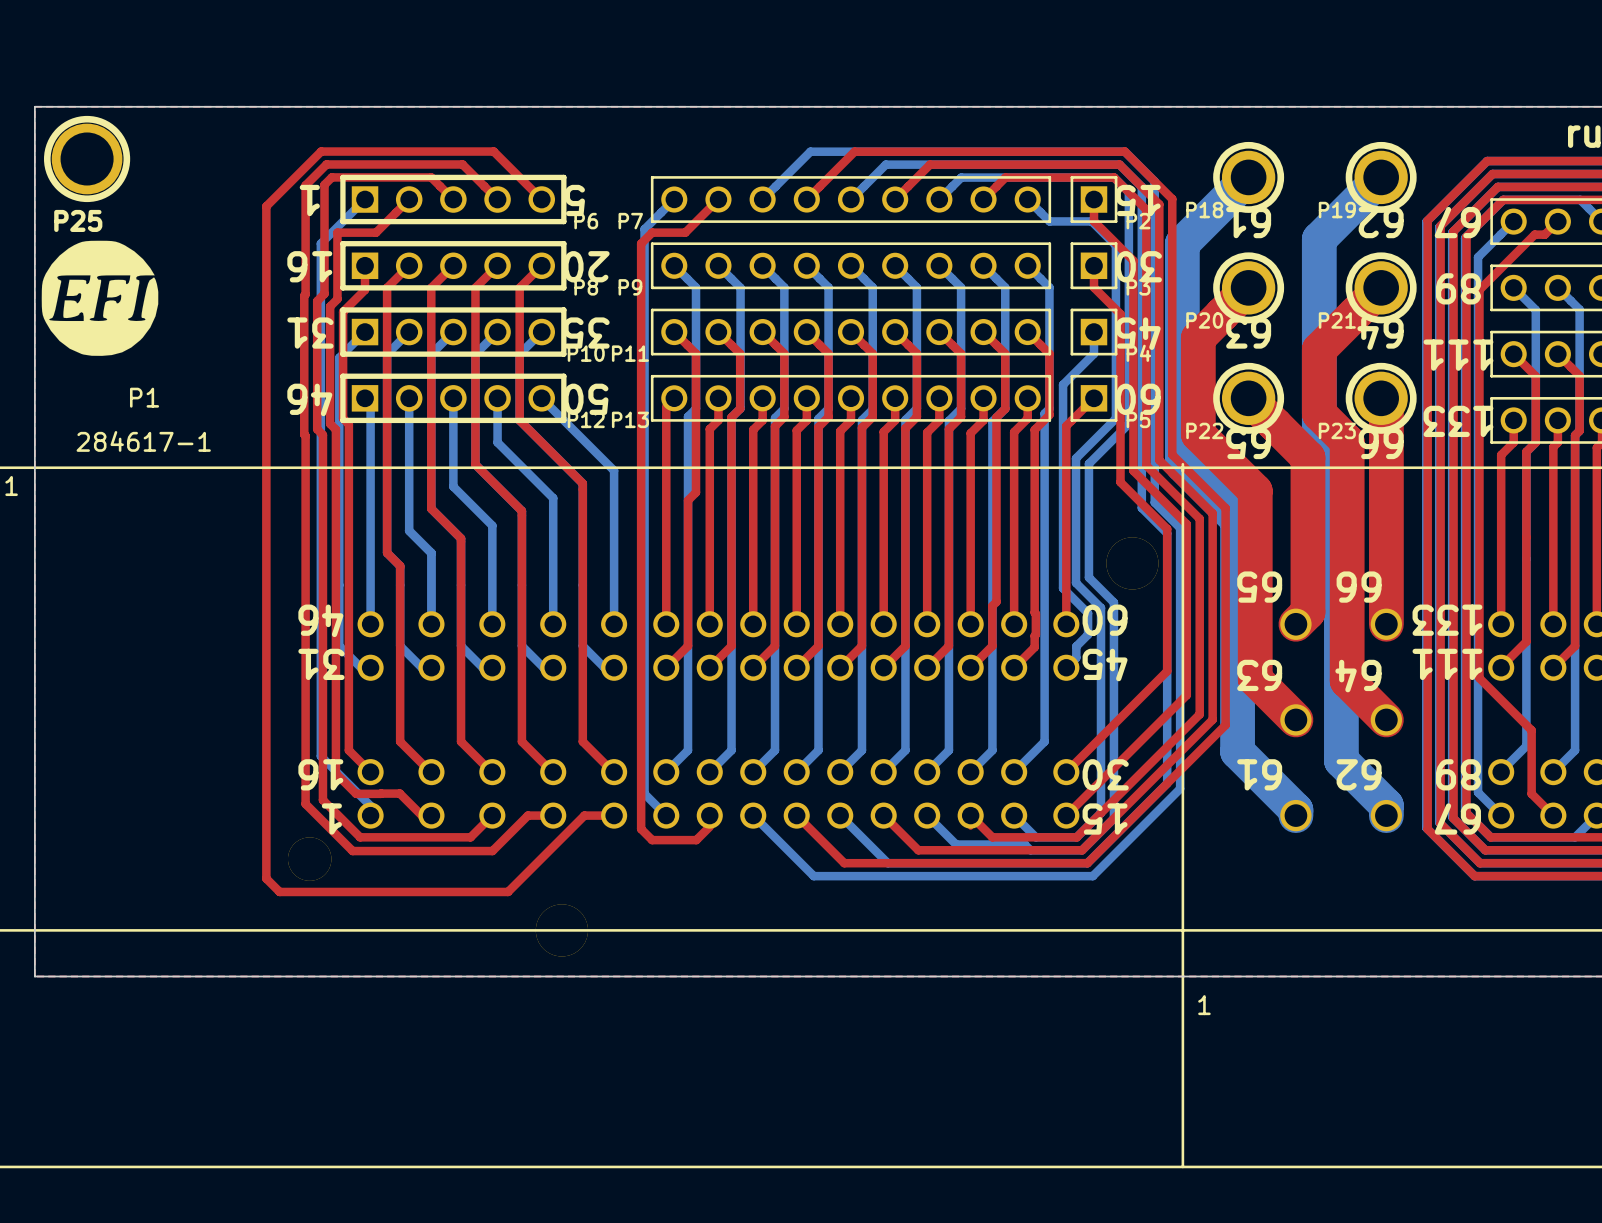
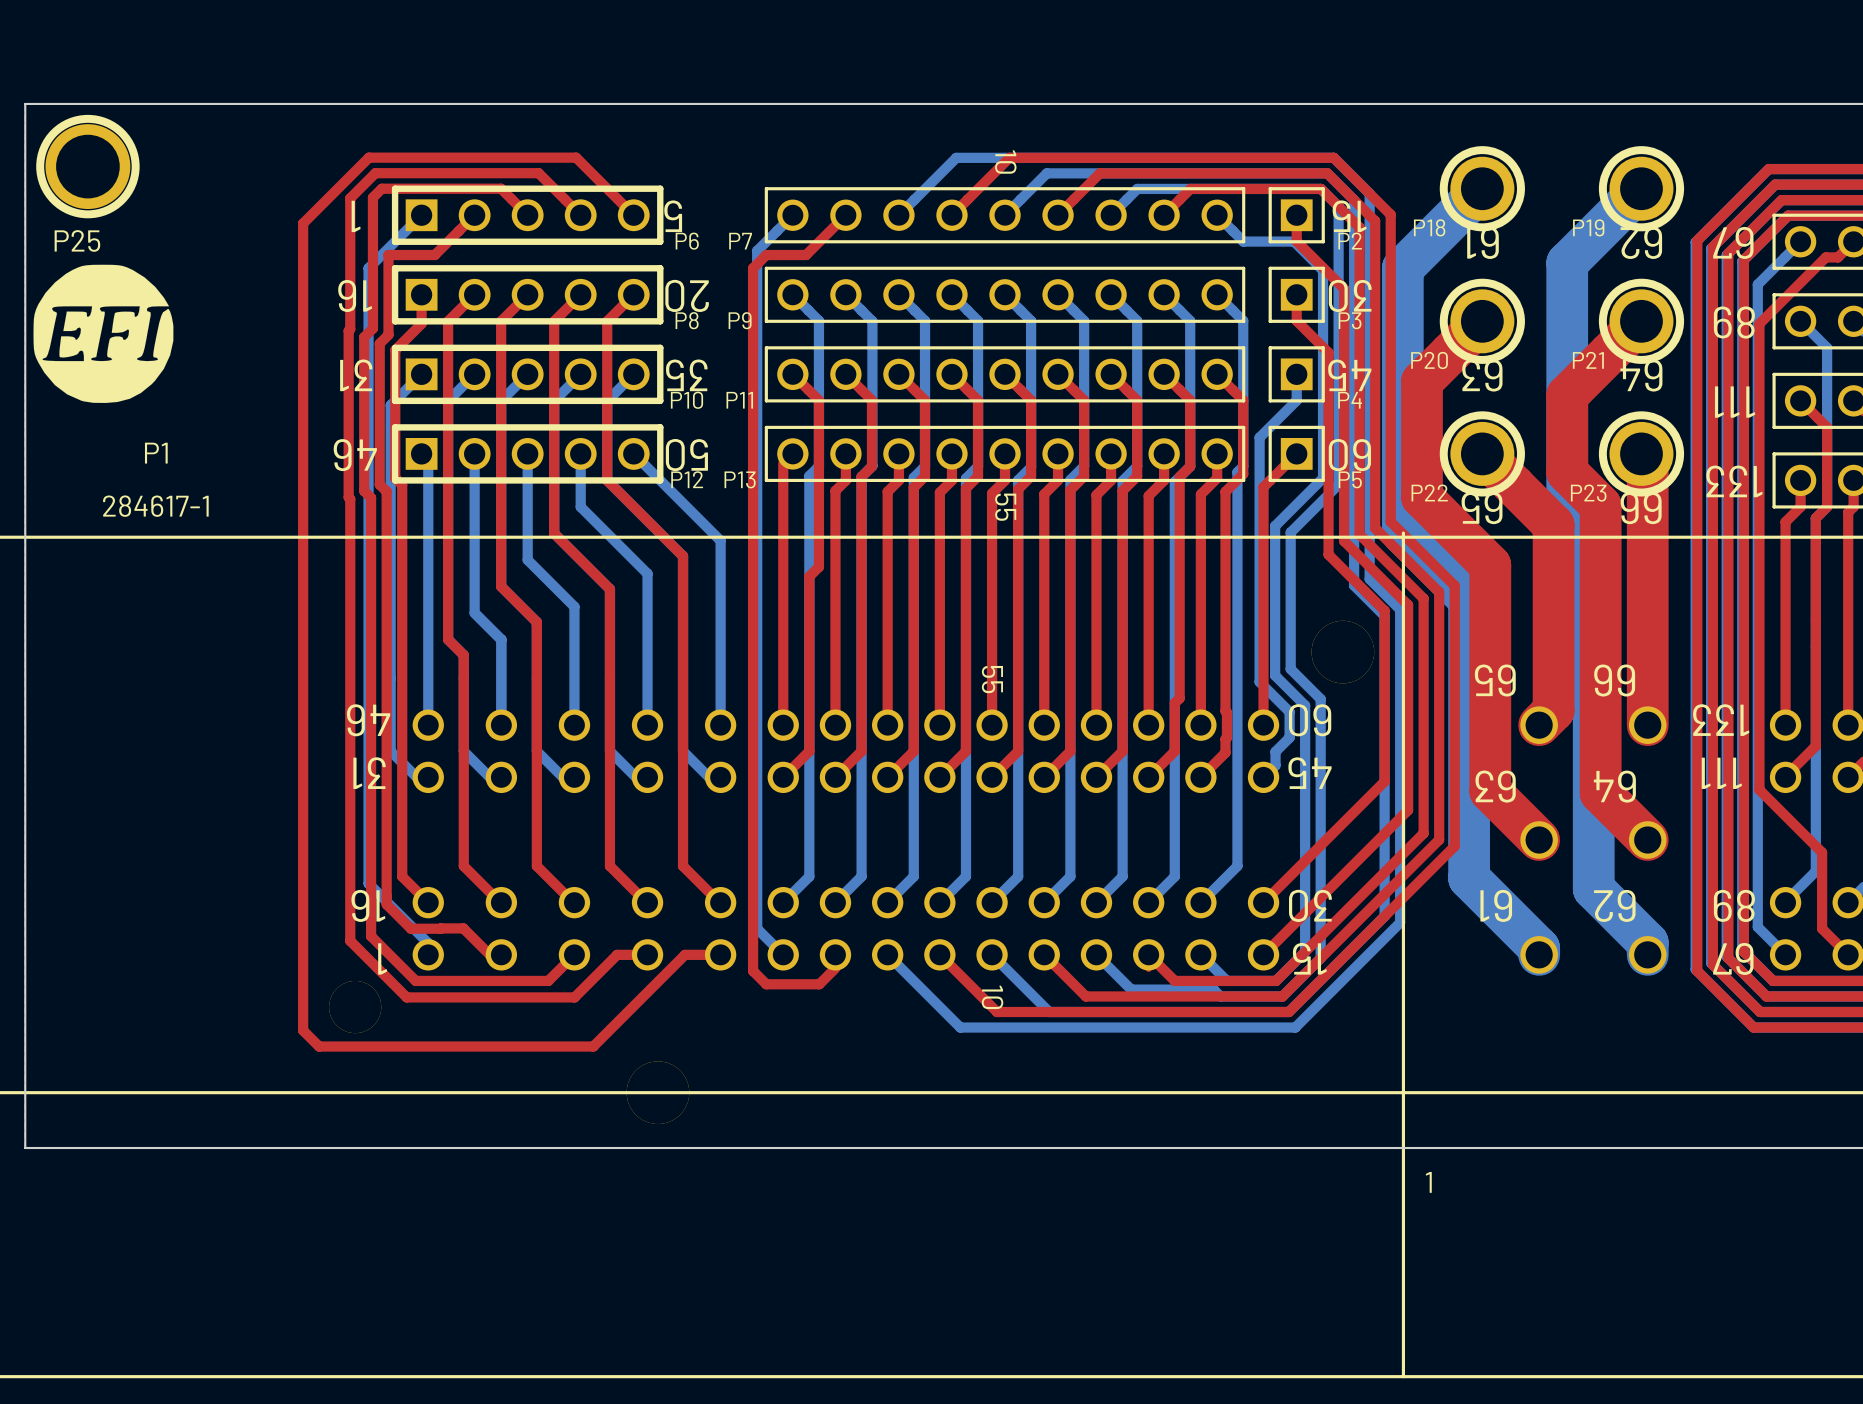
text: none -> 10 (1005, 162)
text: none -> 55 (1005, 507)
text: none -> 55 (992, 679)
text: none -> 10 (992, 997)

